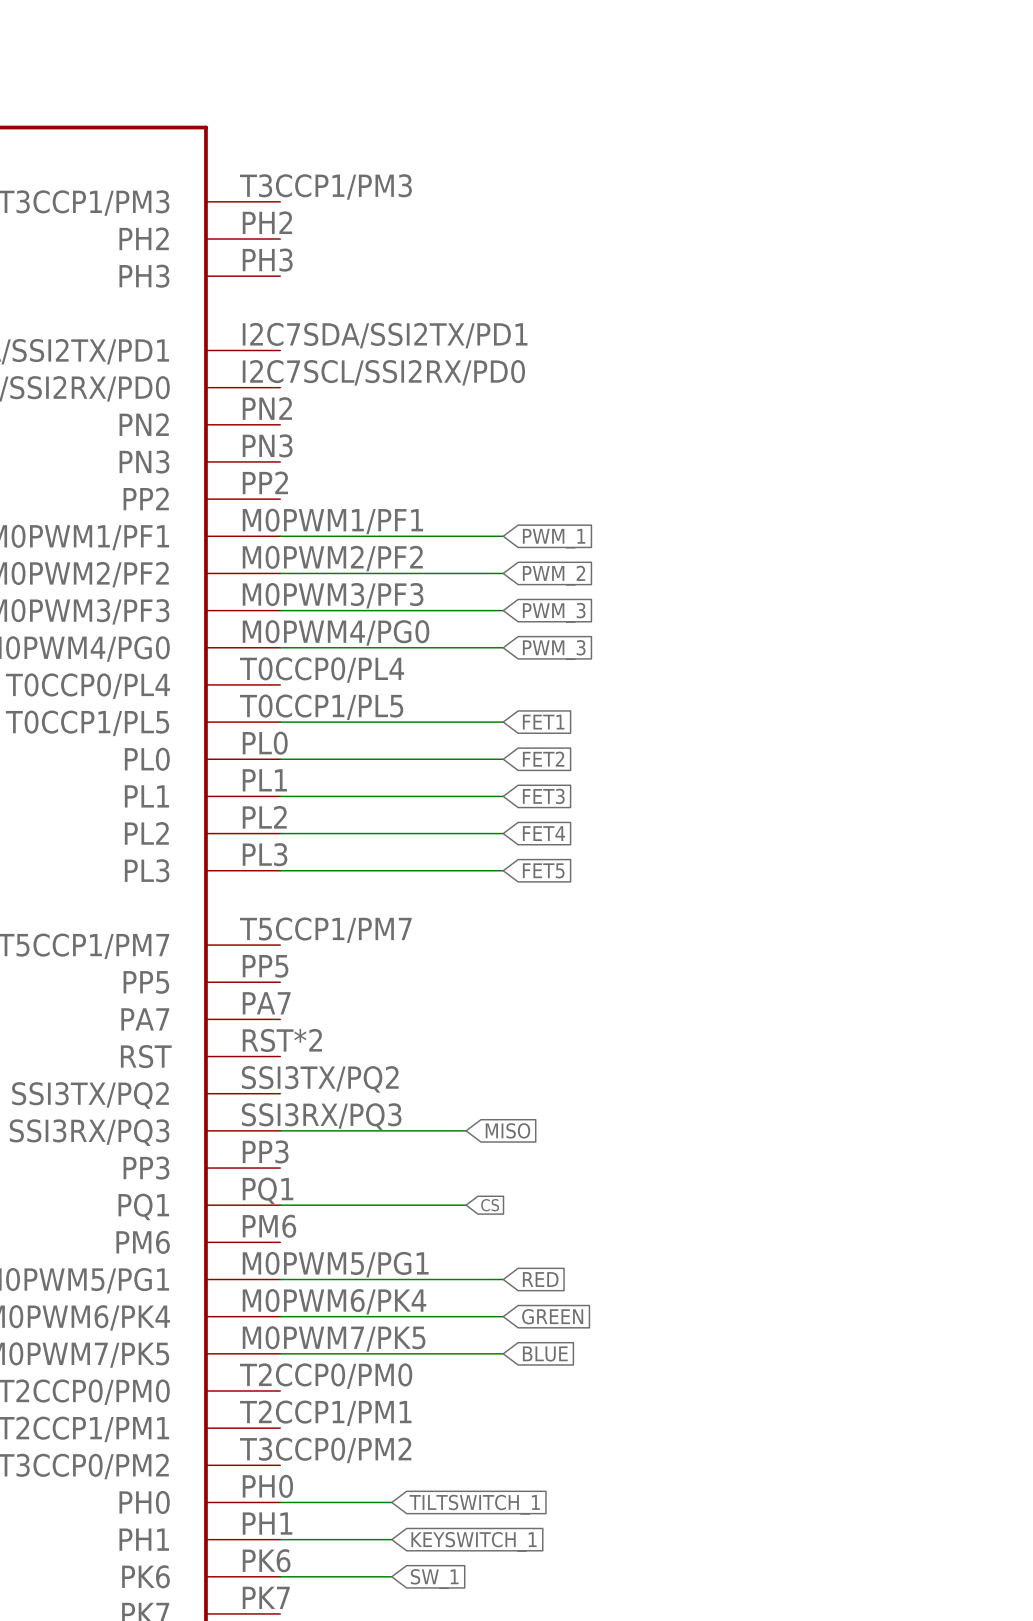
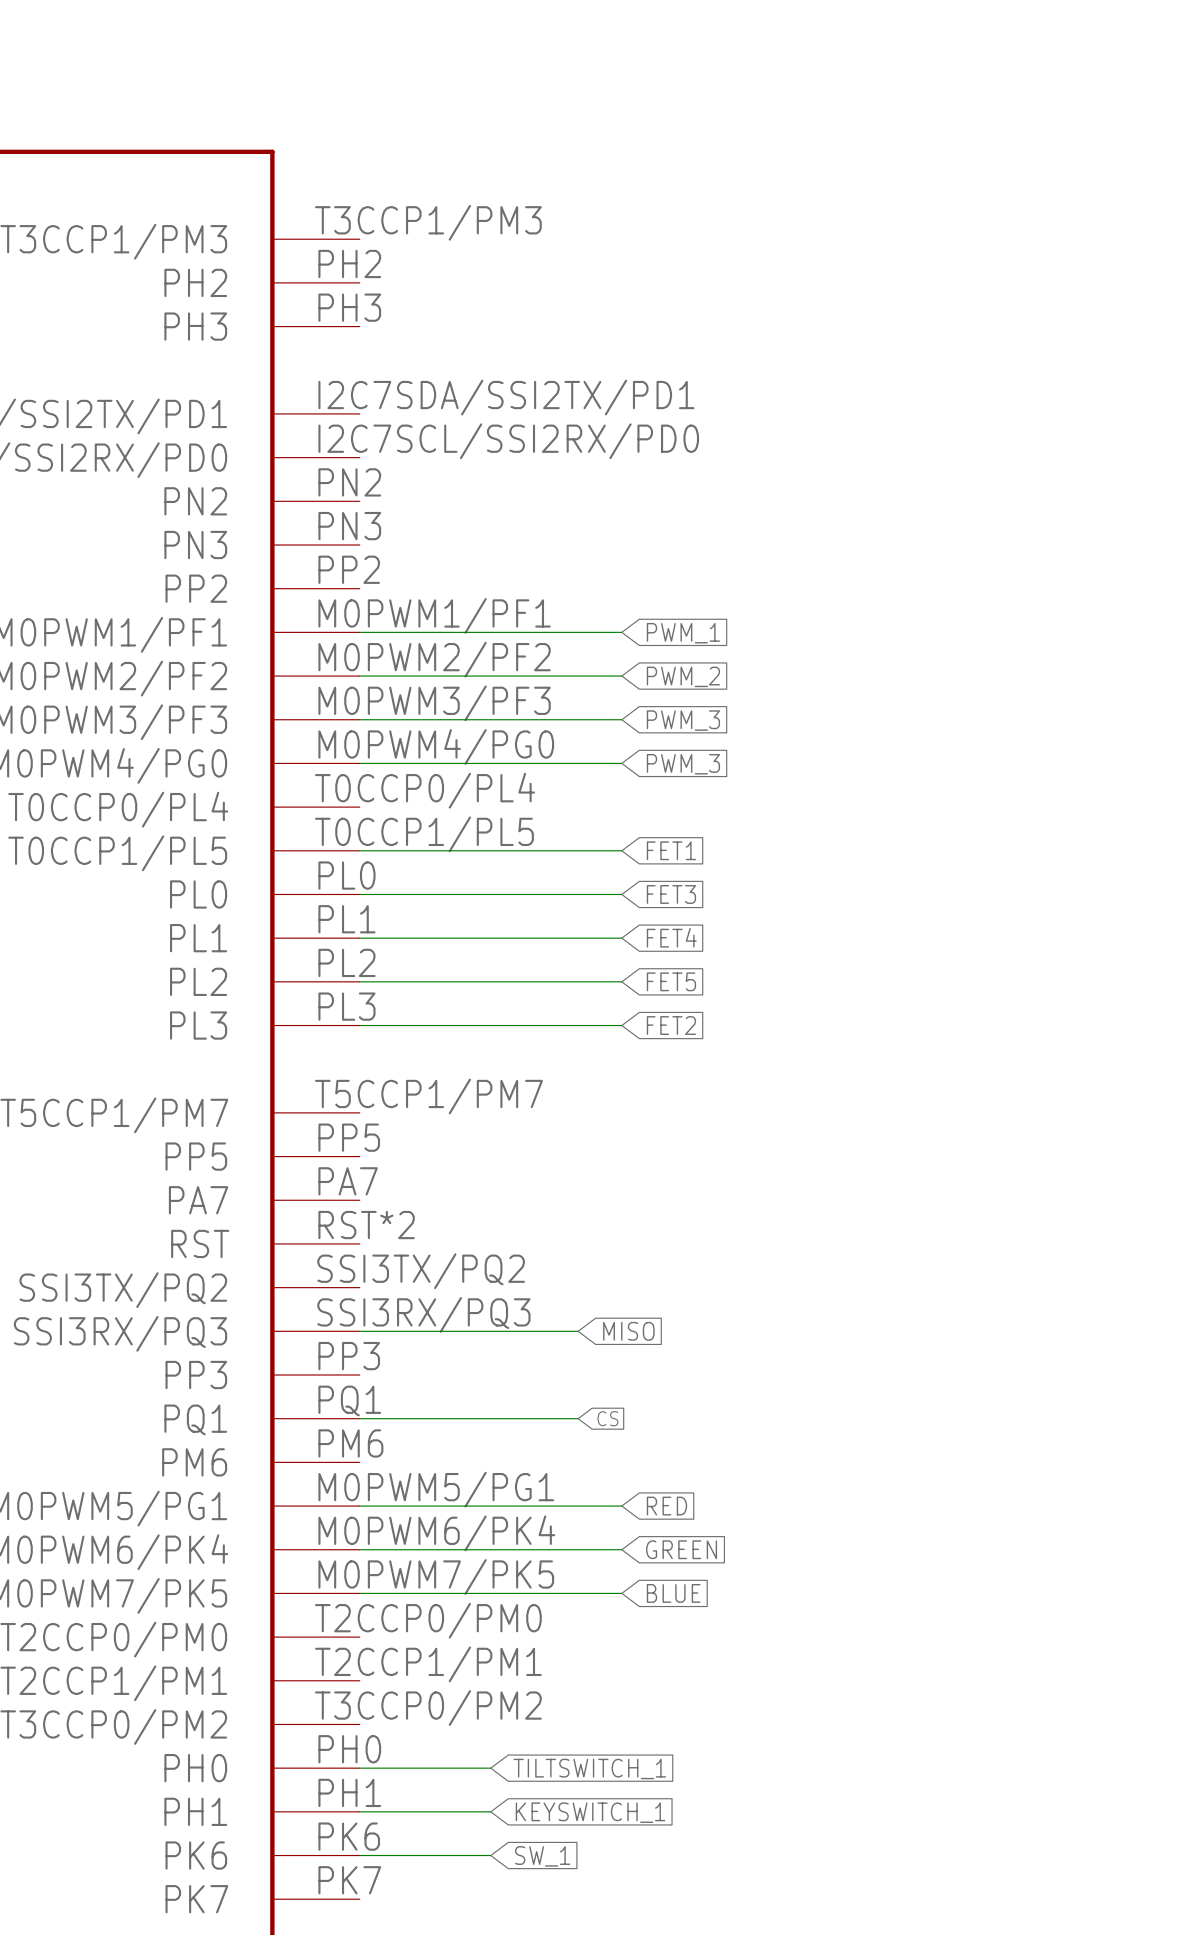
global label: FET2 (543, 759) -> FET3 (671, 894)
global label: FET3 (543, 796) -> FET4 (671, 937)
global label: FET4 (543, 833) -> FET5 (671, 981)
global label: FET5 (543, 870) -> FET2 (671, 1025)

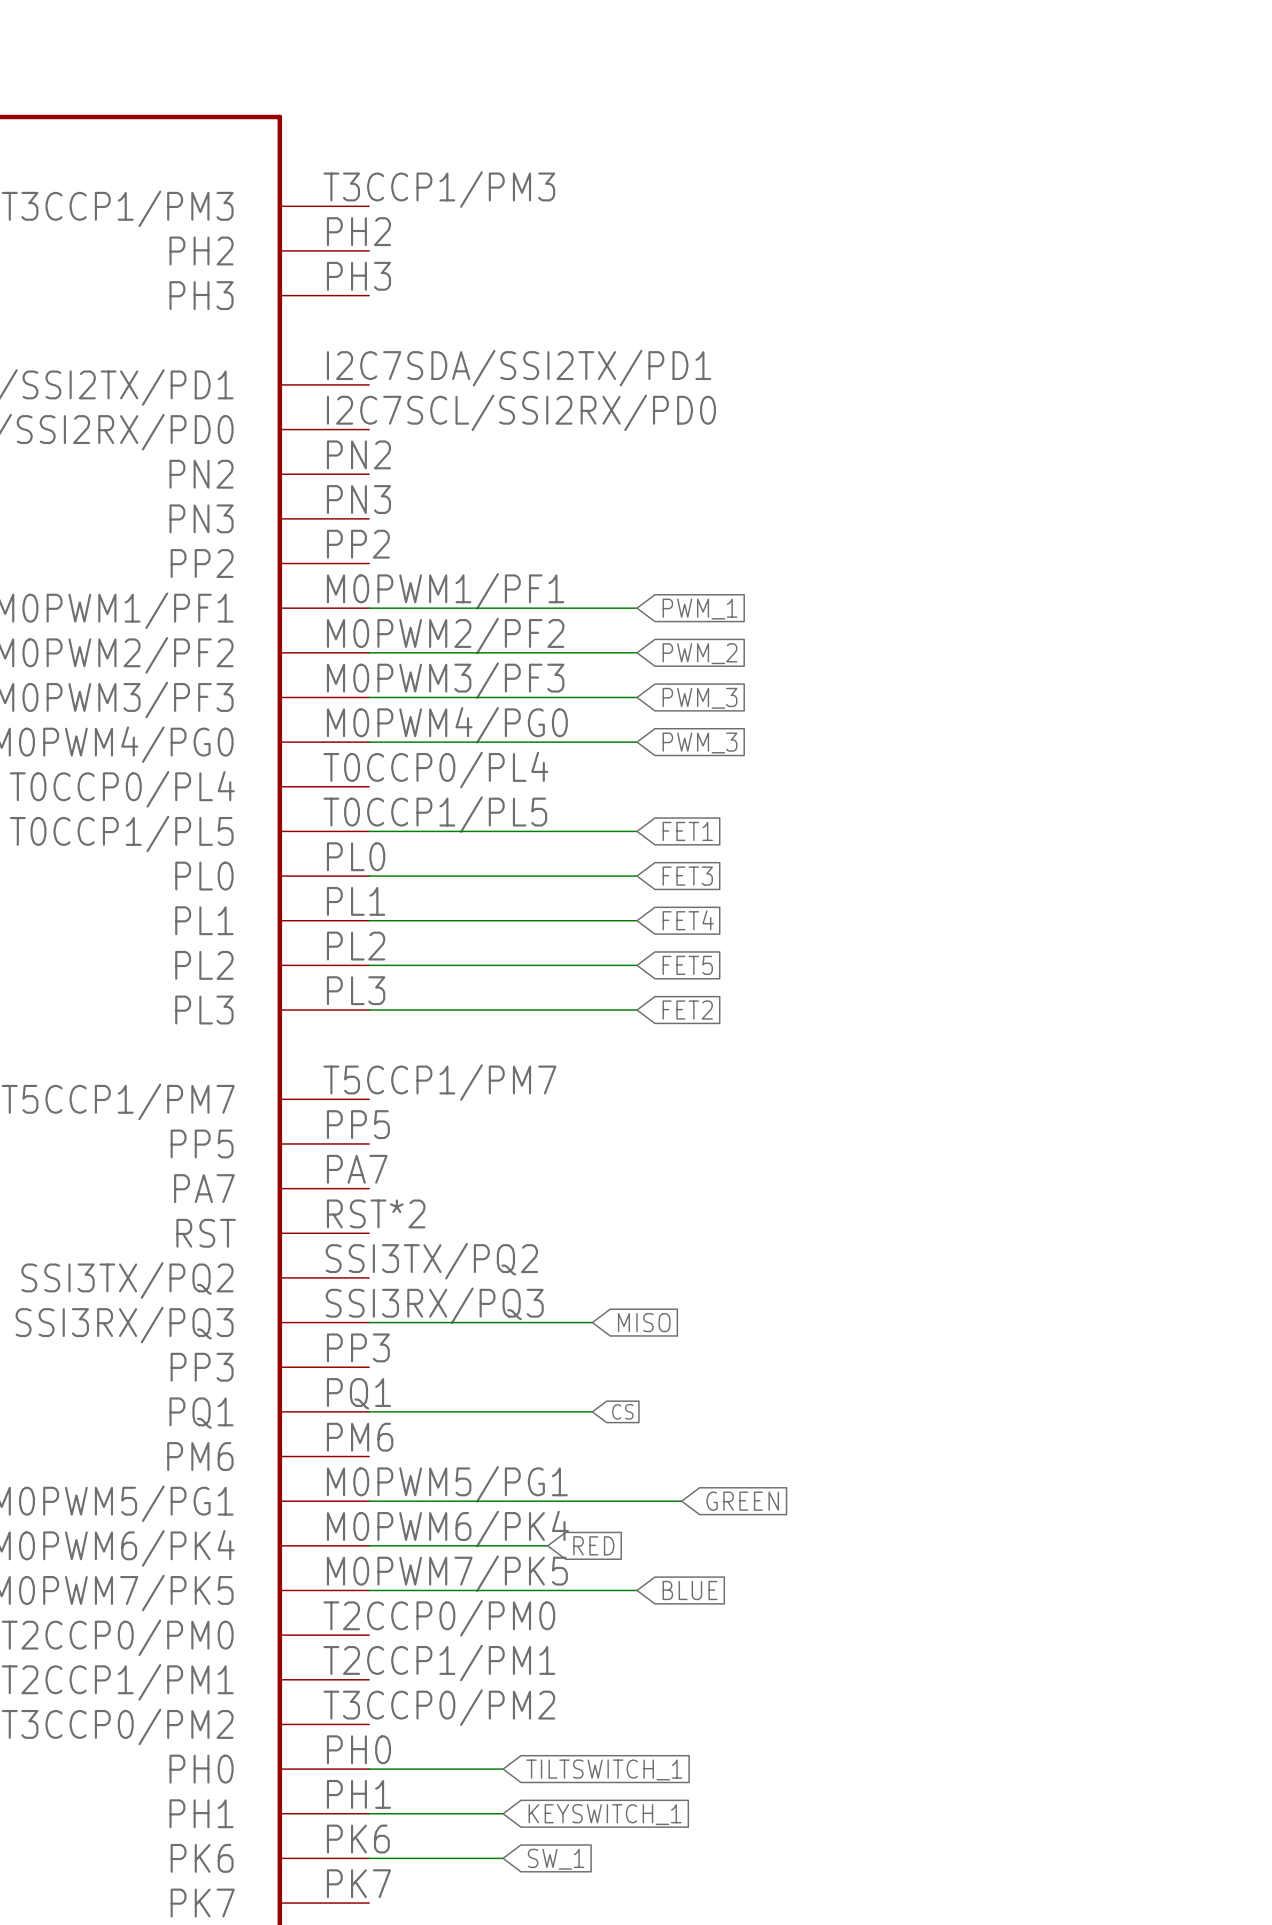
wire: none -> (637, 1501) (681, 1501)
global label position: RED (666, 1506) -> RED (593, 1545)
wire: (534, 1549) (621, 1549) -> none
global label position: GREEN (681, 1549) -> GREEN (742, 1501)

